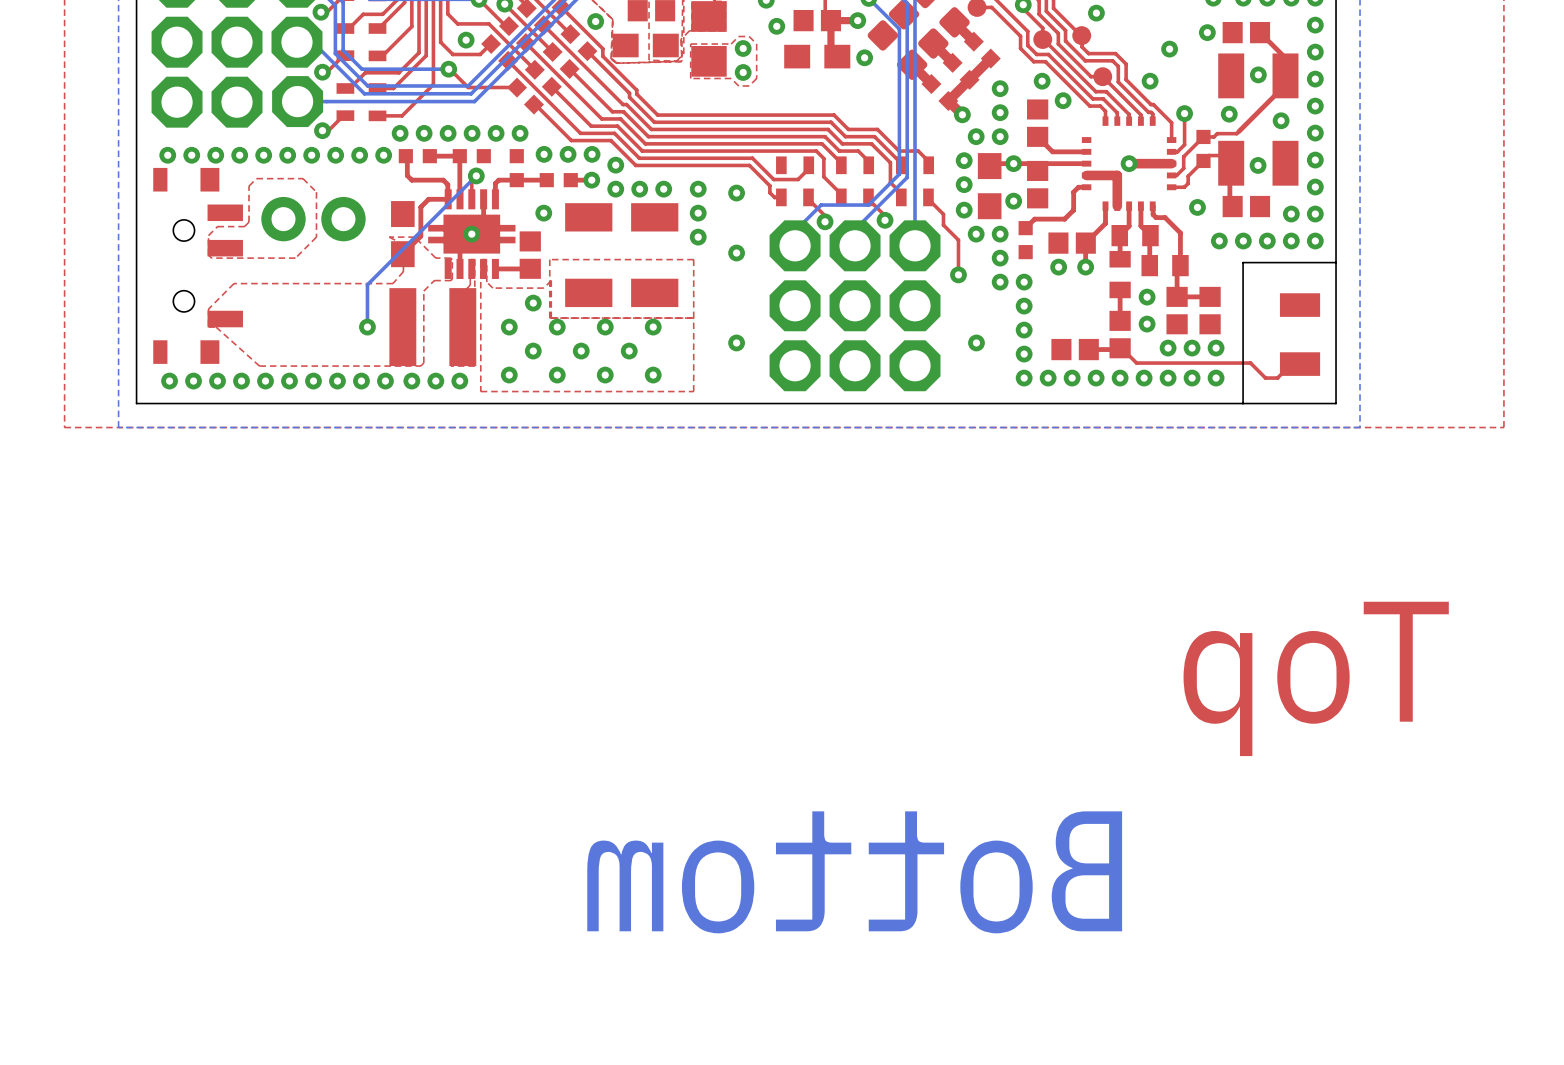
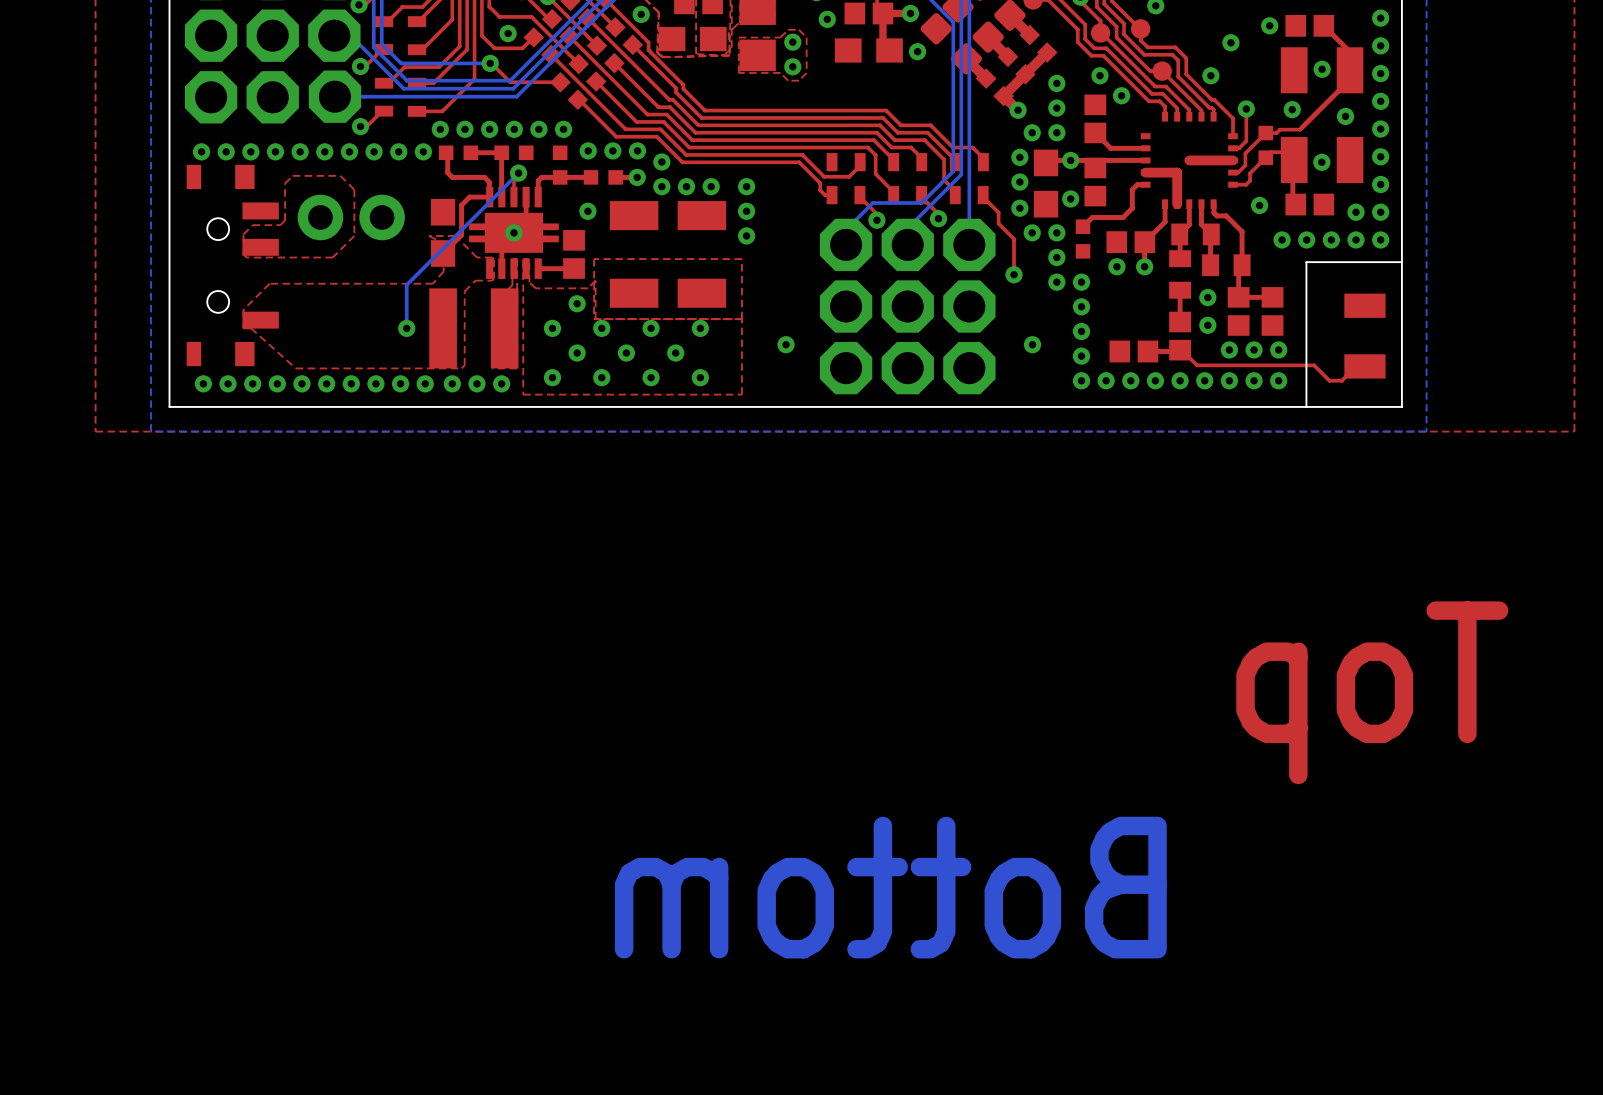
via: (1129, 163) -> none
via: (736, 193) -> none
via: (736, 253) -> none

